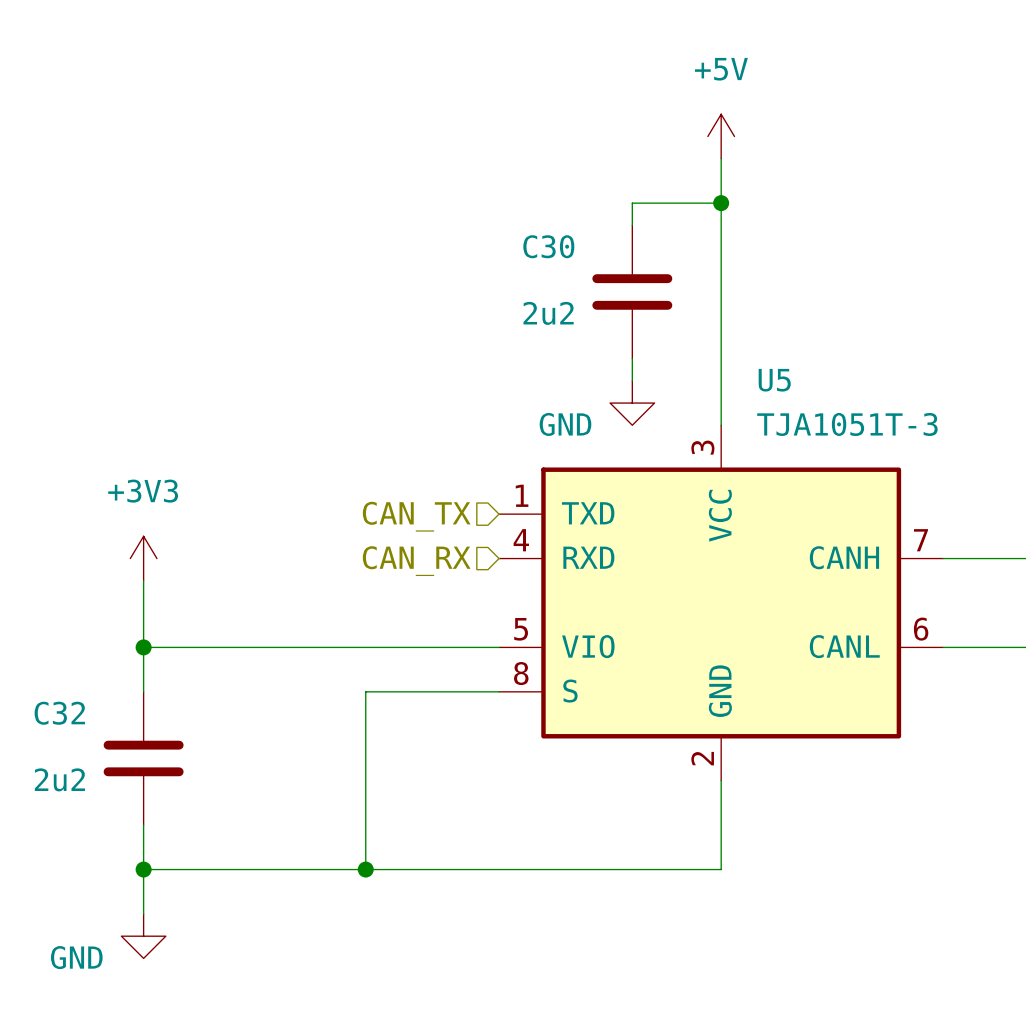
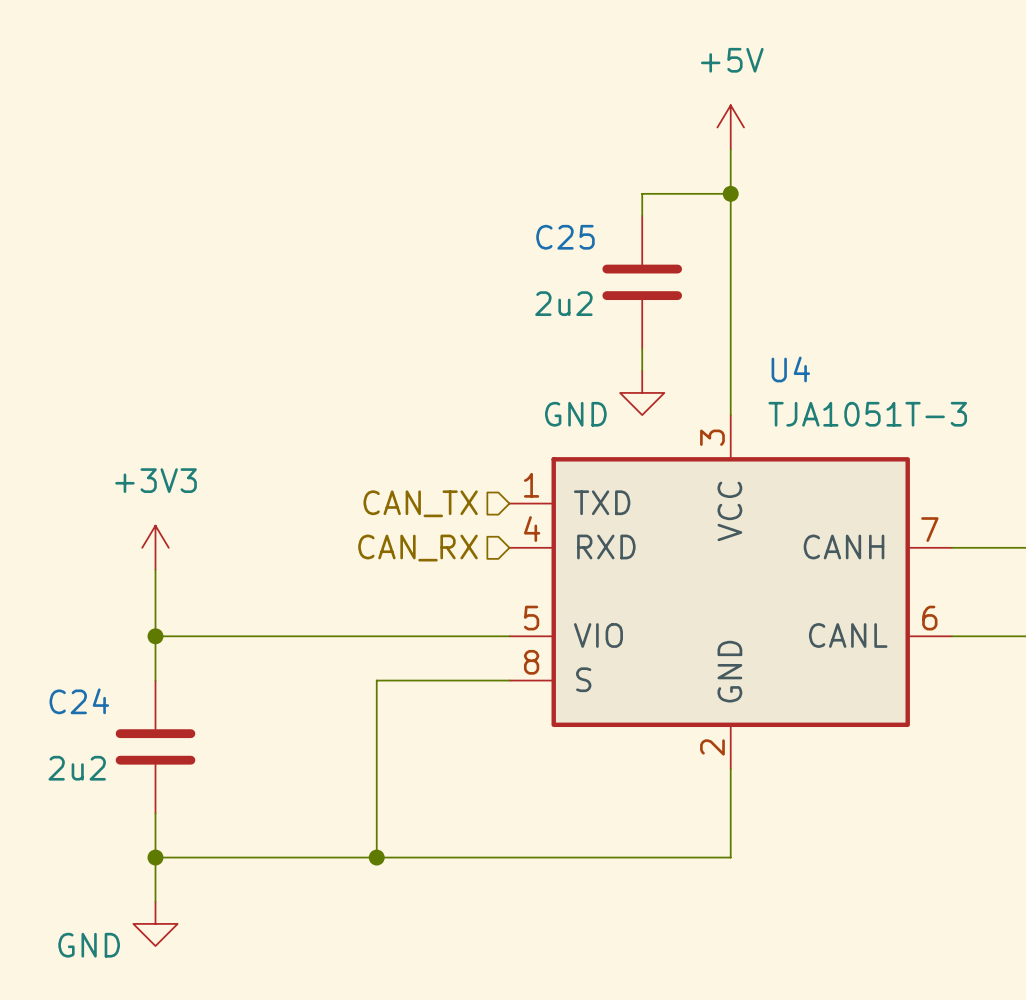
C30 name: C30 (548, 246) -> C25 (565, 237)
U5 name: U5 (774, 380) -> U4 (790, 369)
C32 name: C32 (59, 713) -> C24 (79, 701)

